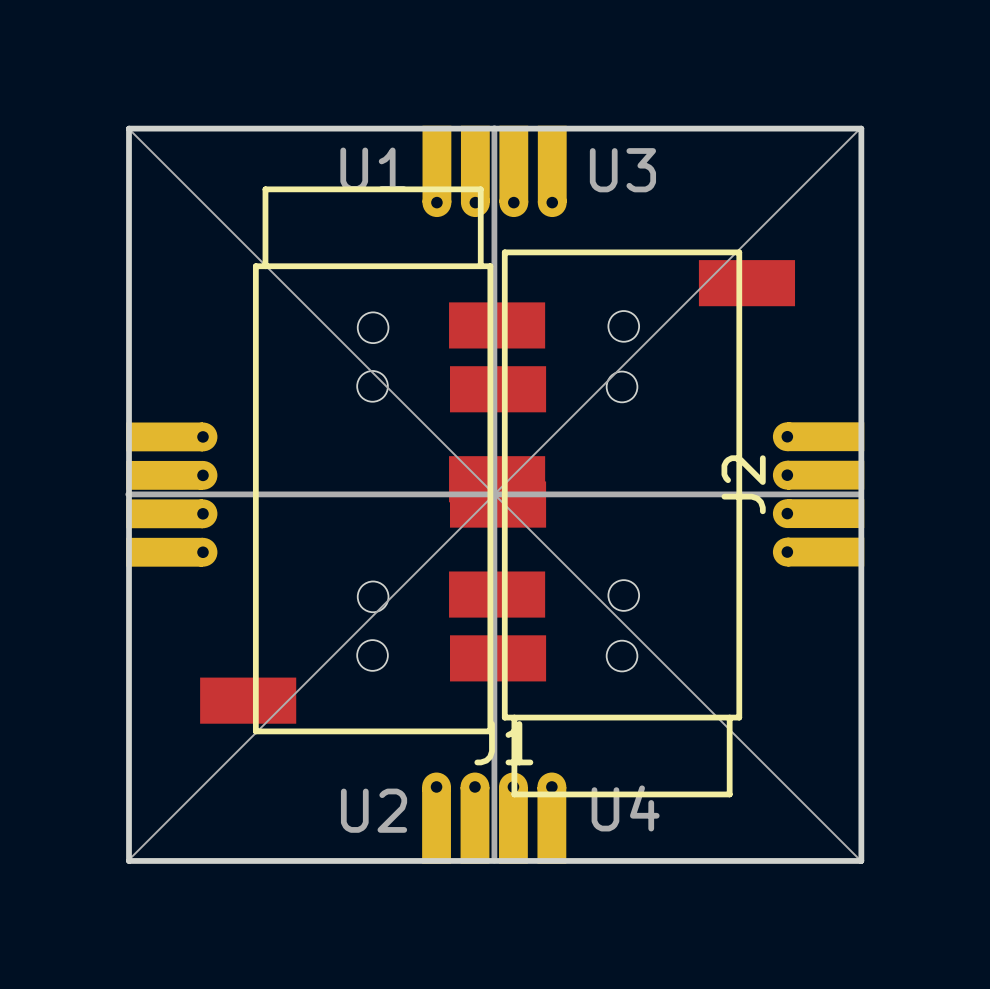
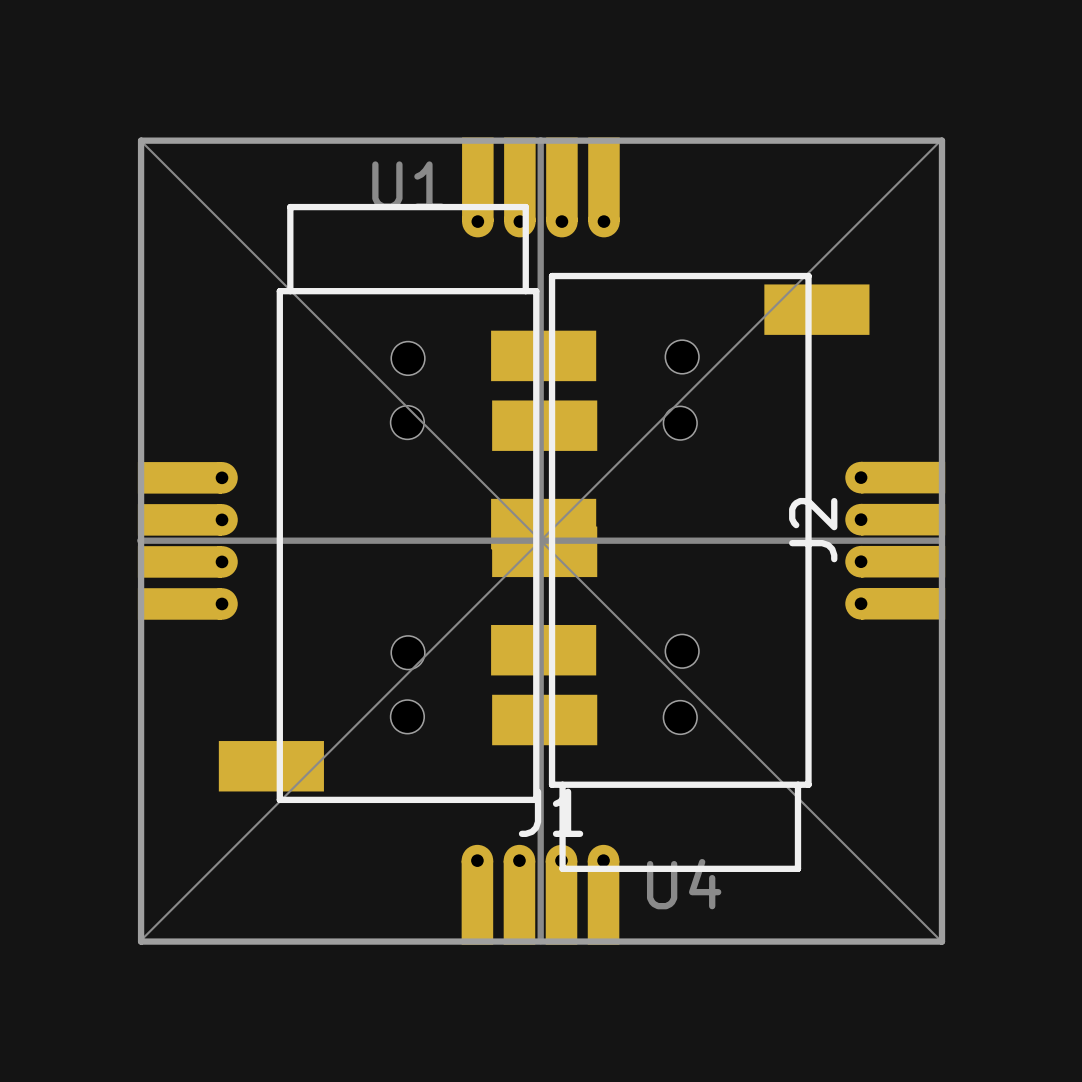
U3 name: U3 (622, 170) -> none
U2 name: U2 (374, 810) -> none

